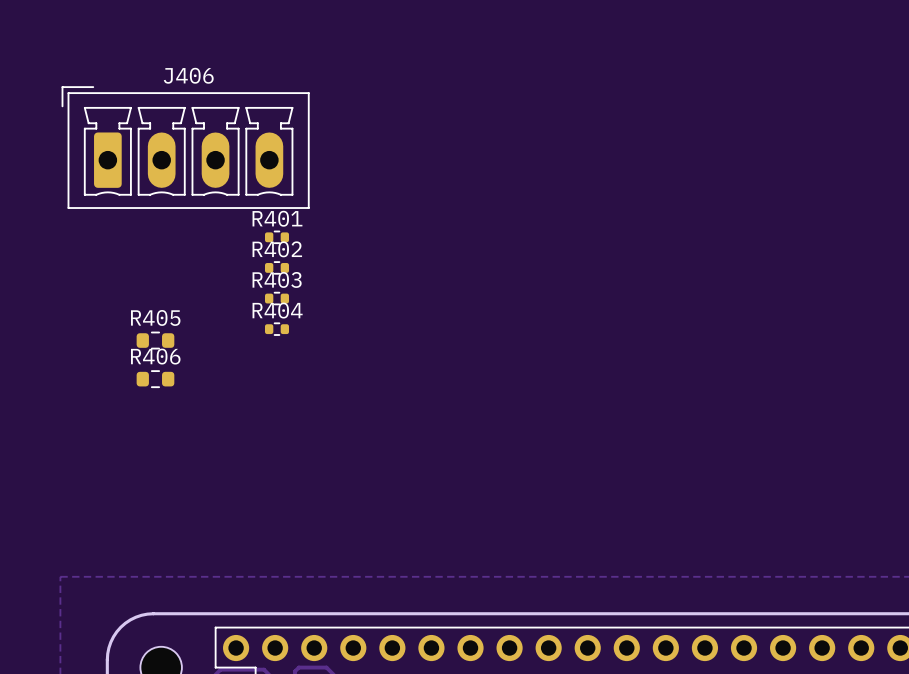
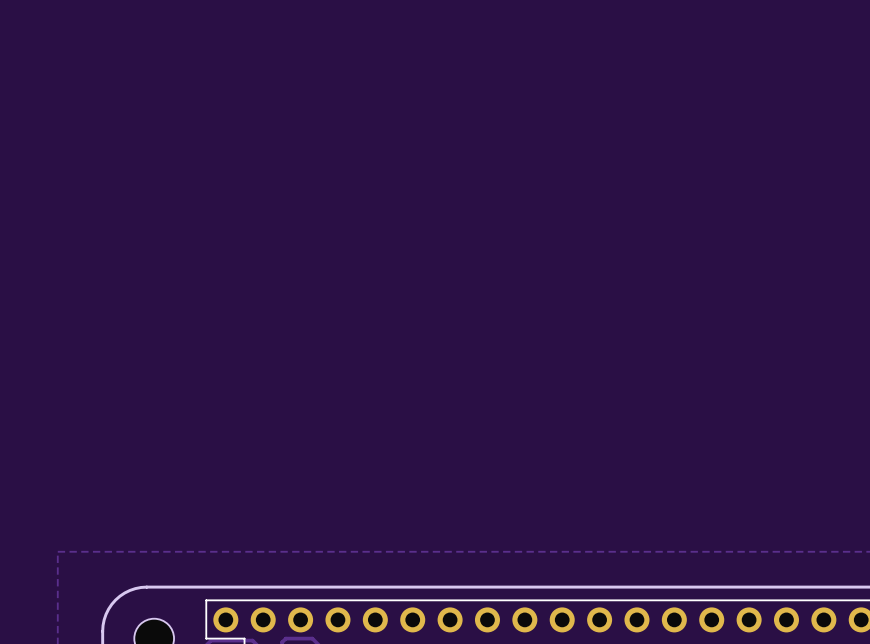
J406: (185, 147) -> none
R401: (277, 237) -> none
R402: (277, 267) -> none
R403: (277, 298) -> none
R404: (277, 329) -> none
R405: (155, 340) -> none
R406: (155, 379) -> none

